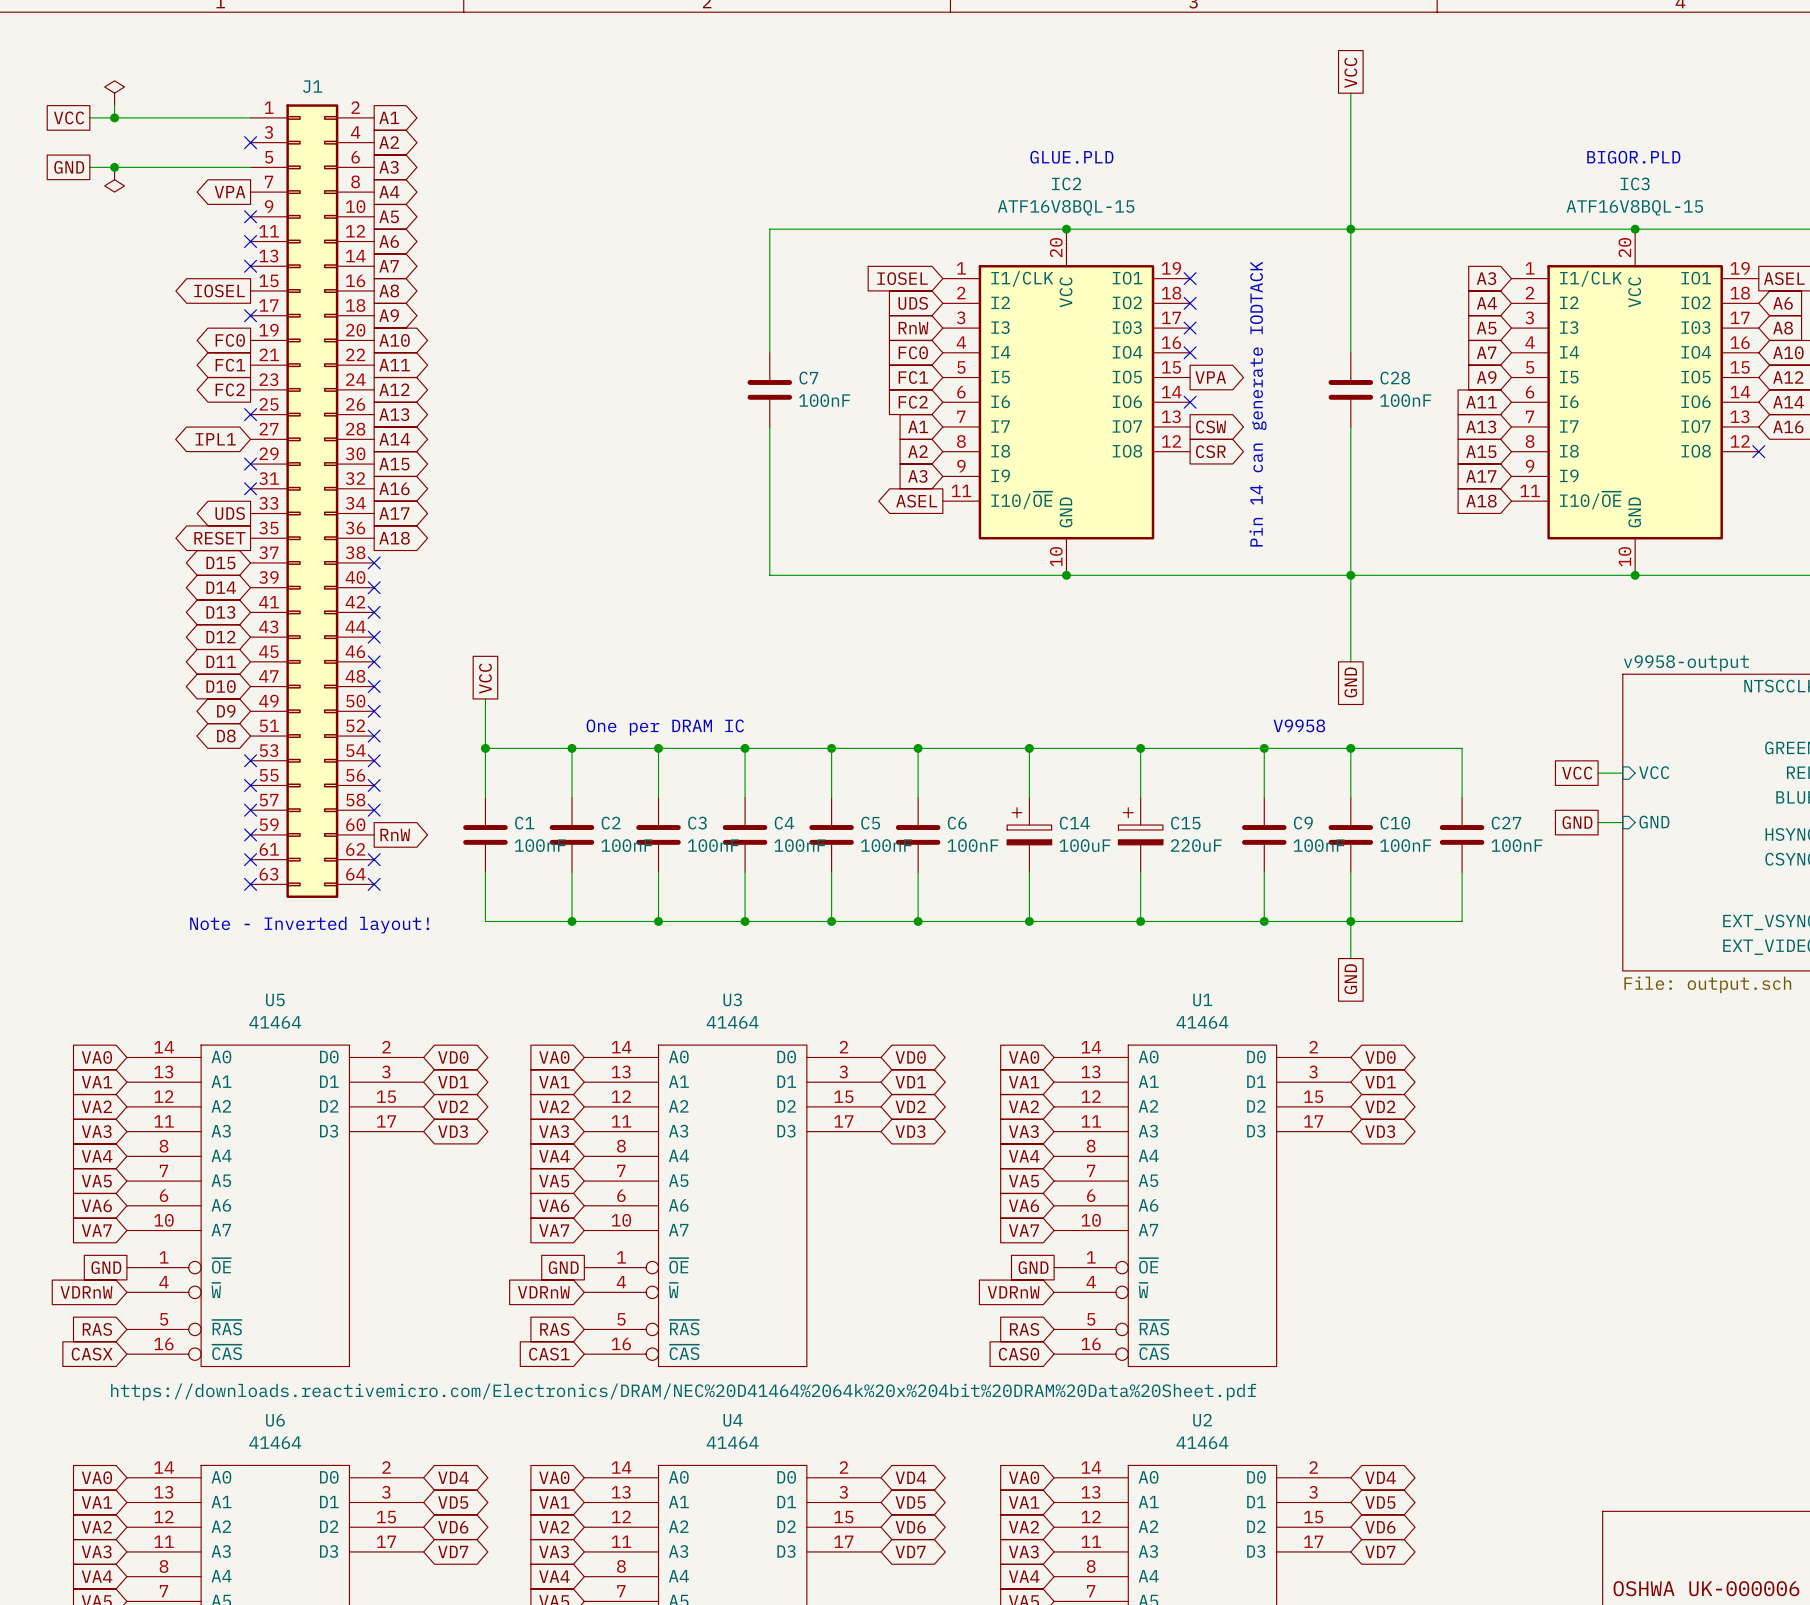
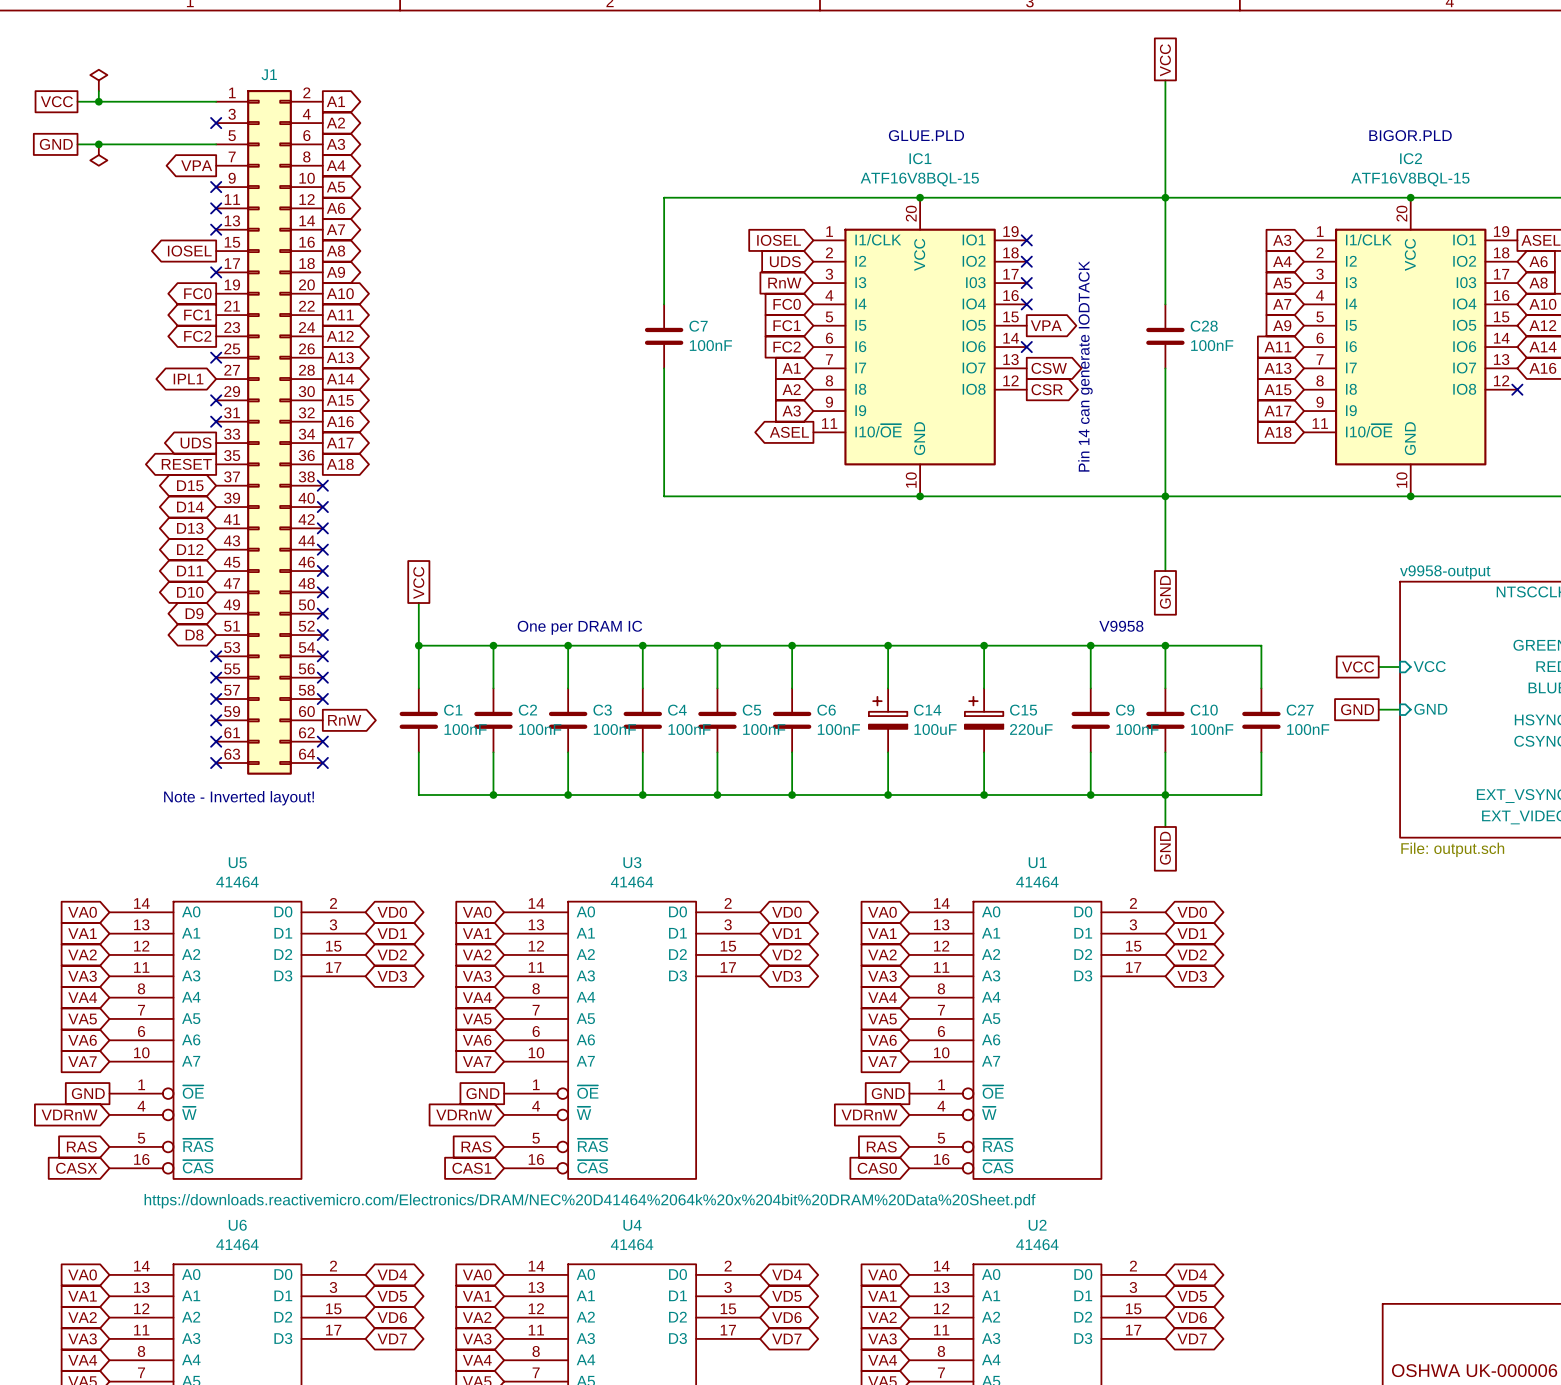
IC2 name: IC2 (1066, 183) -> IC1 (920, 158)
IC3 name: IC3 (1635, 183) -> IC2 (1411, 158)

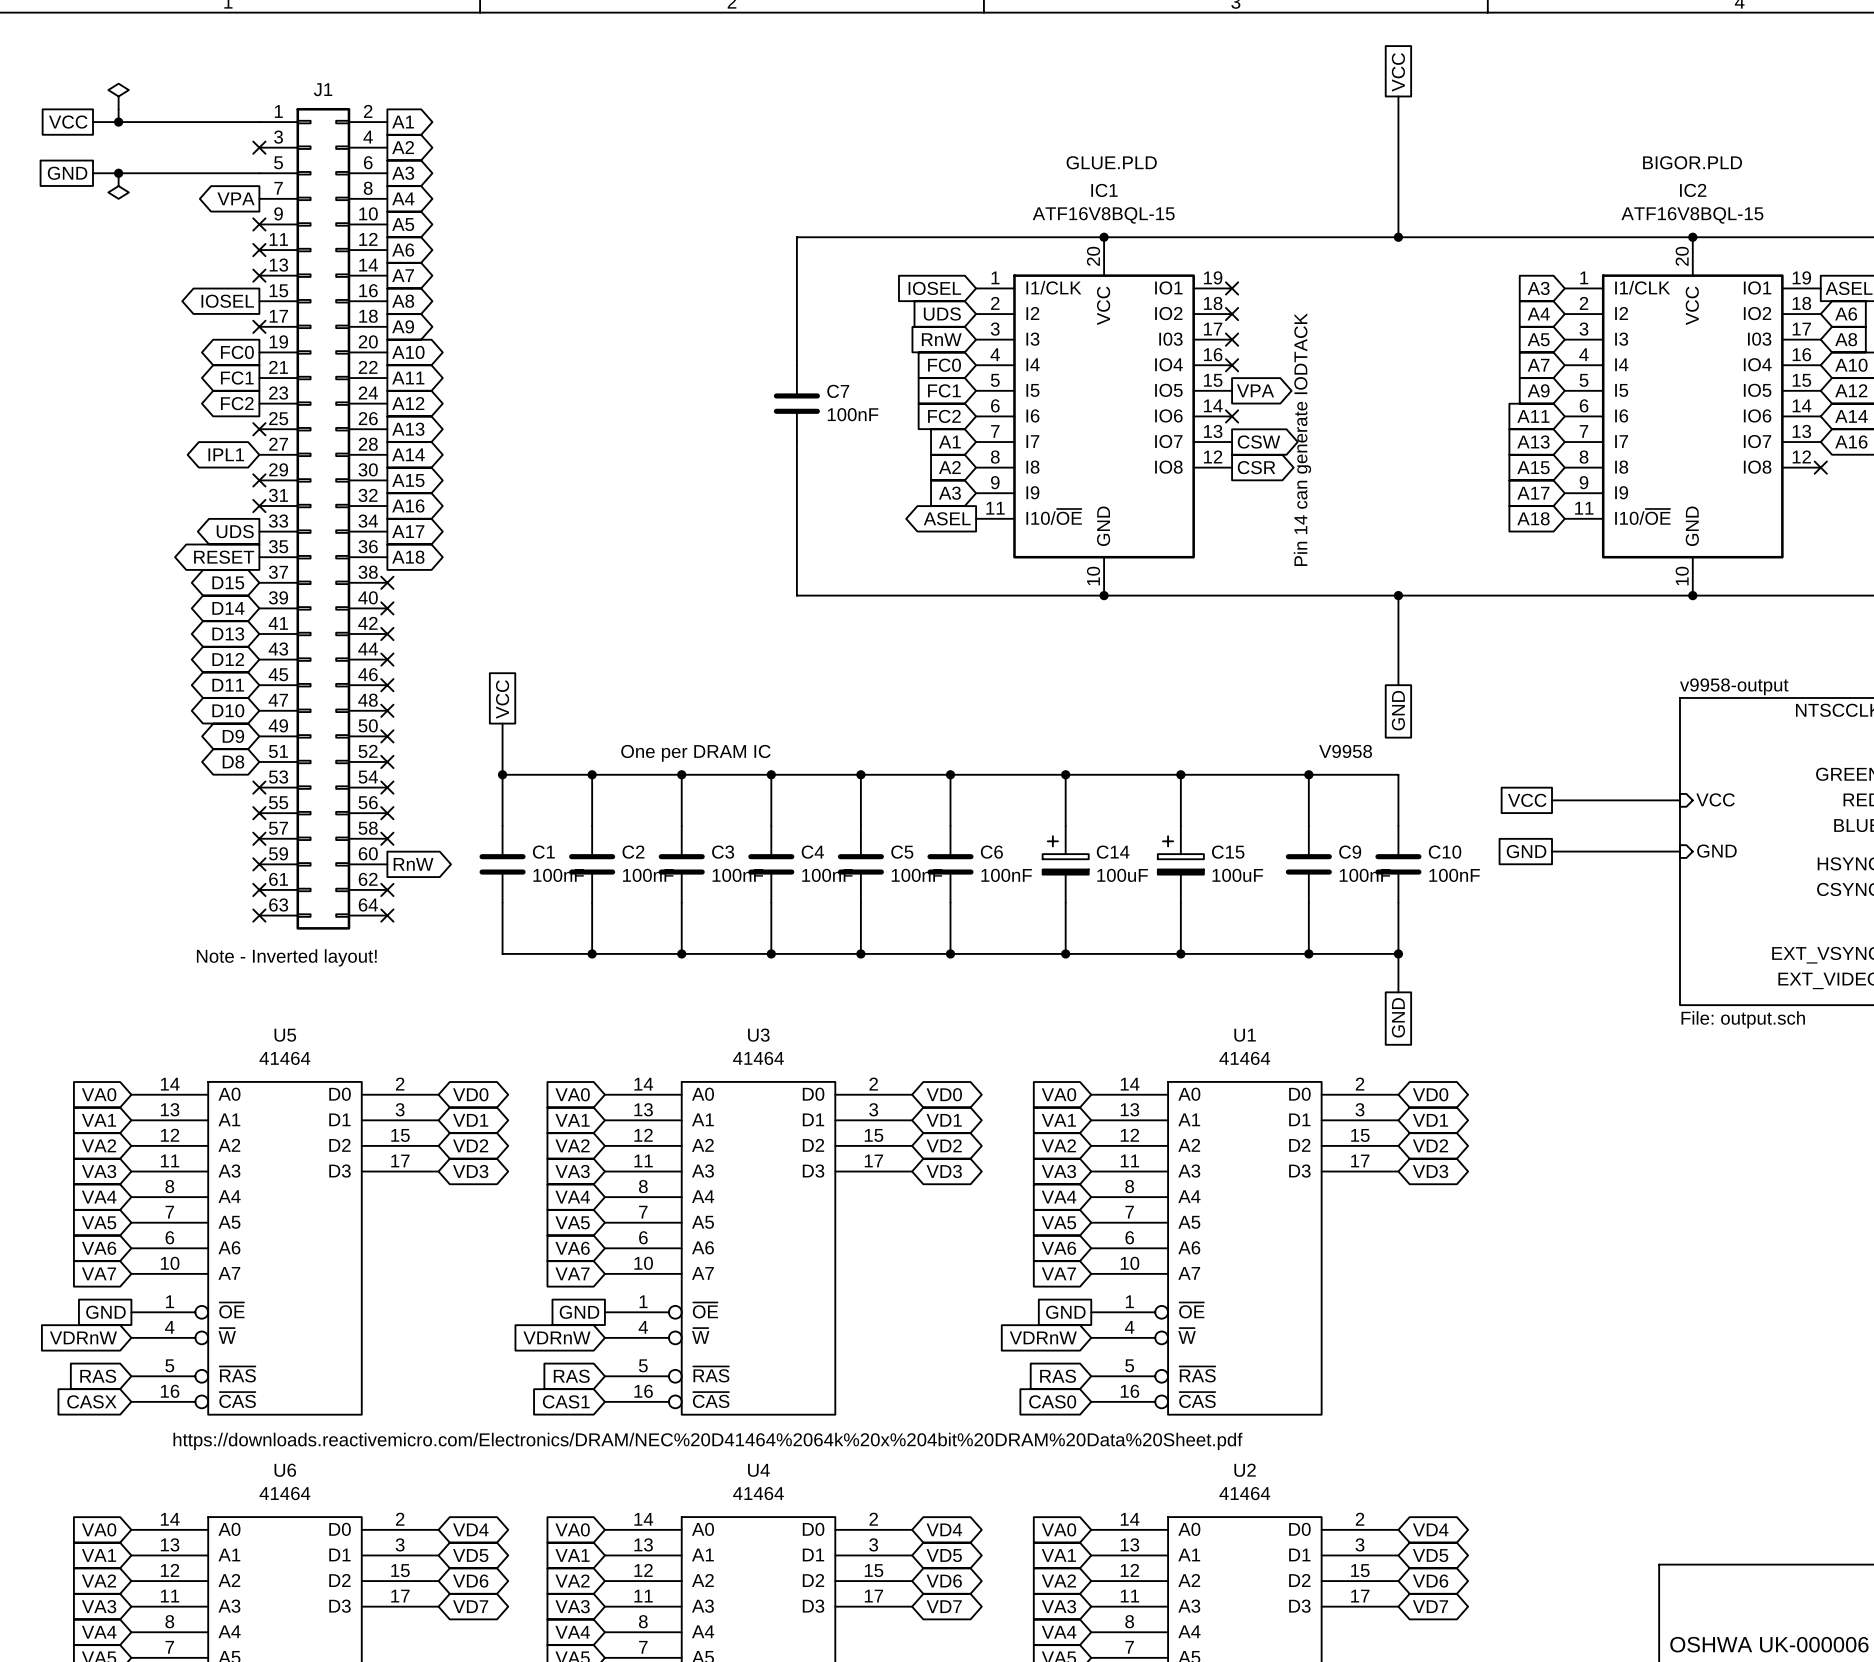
wire: (1165, 197) (1165, 304) -> none
C28: 100nF (1165, 336) -> none
wire: (1165, 368) (1165, 496) -> none
wire: (1165, 645) (1261, 645) (1261, 688) -> none
junction: (1165, 645) -> none
wire: none -> (1552, 800) (1654, 800)
global label position: VCC (1358, 667) -> VCC (1527, 800)
wire: none -> (1552, 851) (1654, 851)
global label position: GND (1357, 709) -> GND (1526, 851)
C27: 100nF (1261, 720) -> none
C15 value: 220uF (1031, 729) -> 100uF (1237, 875)
wire: (1261, 752) (1261, 794) (1165, 794) -> none

